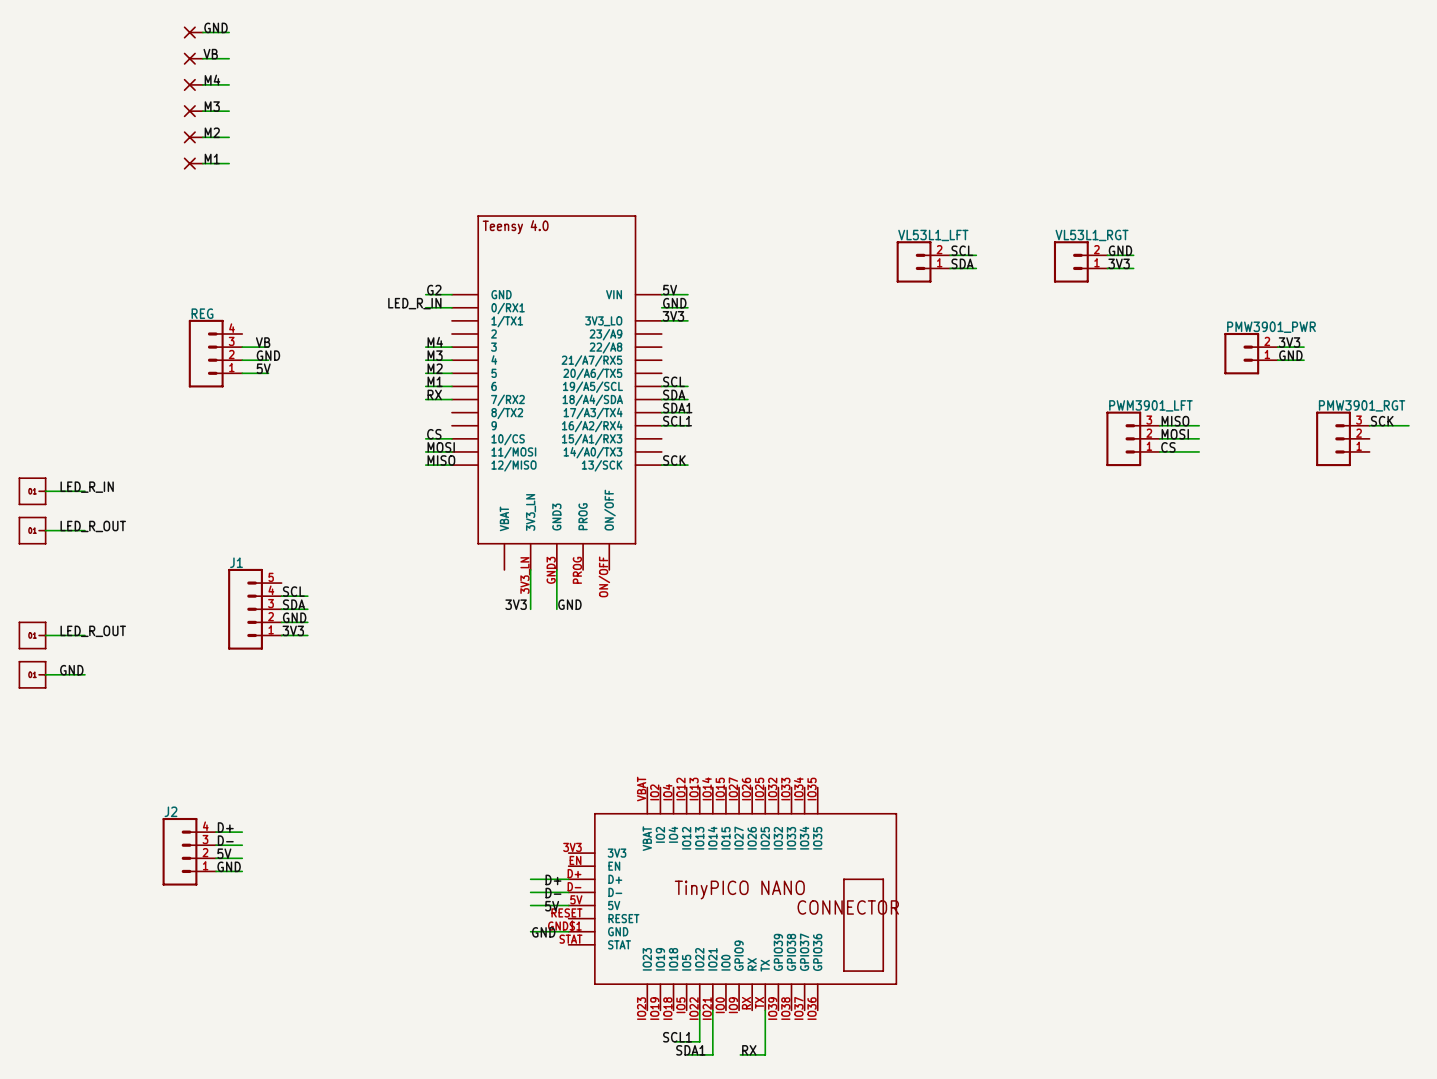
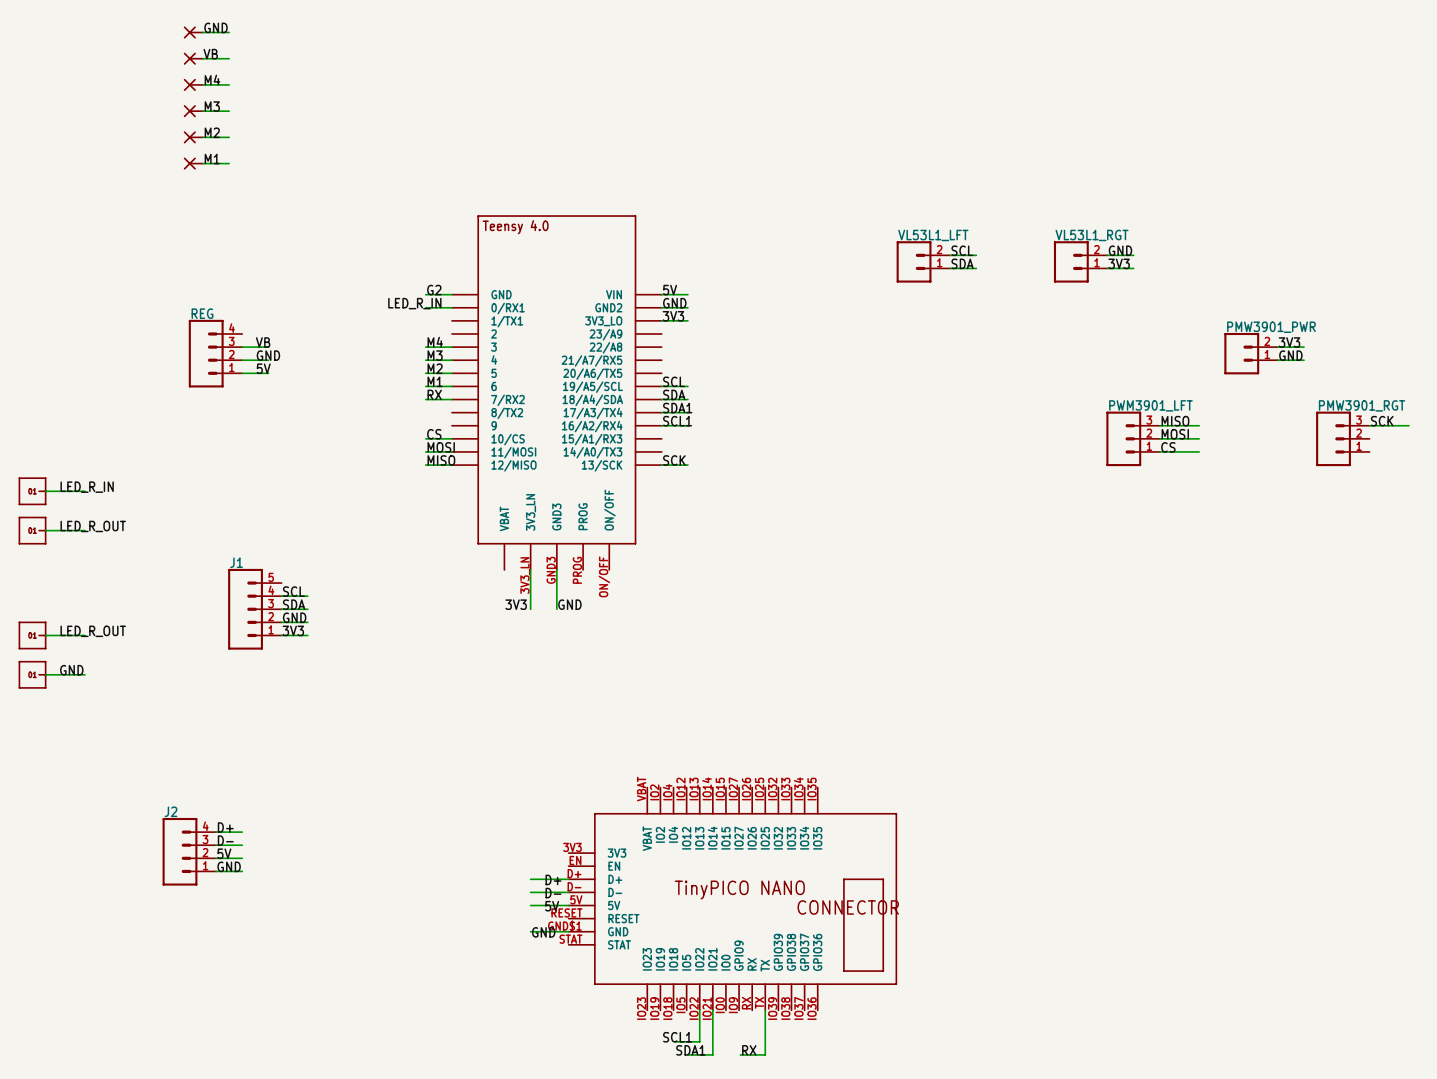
part symbol: [451, 215, 662, 570] -> [451, 215, 662, 570]

